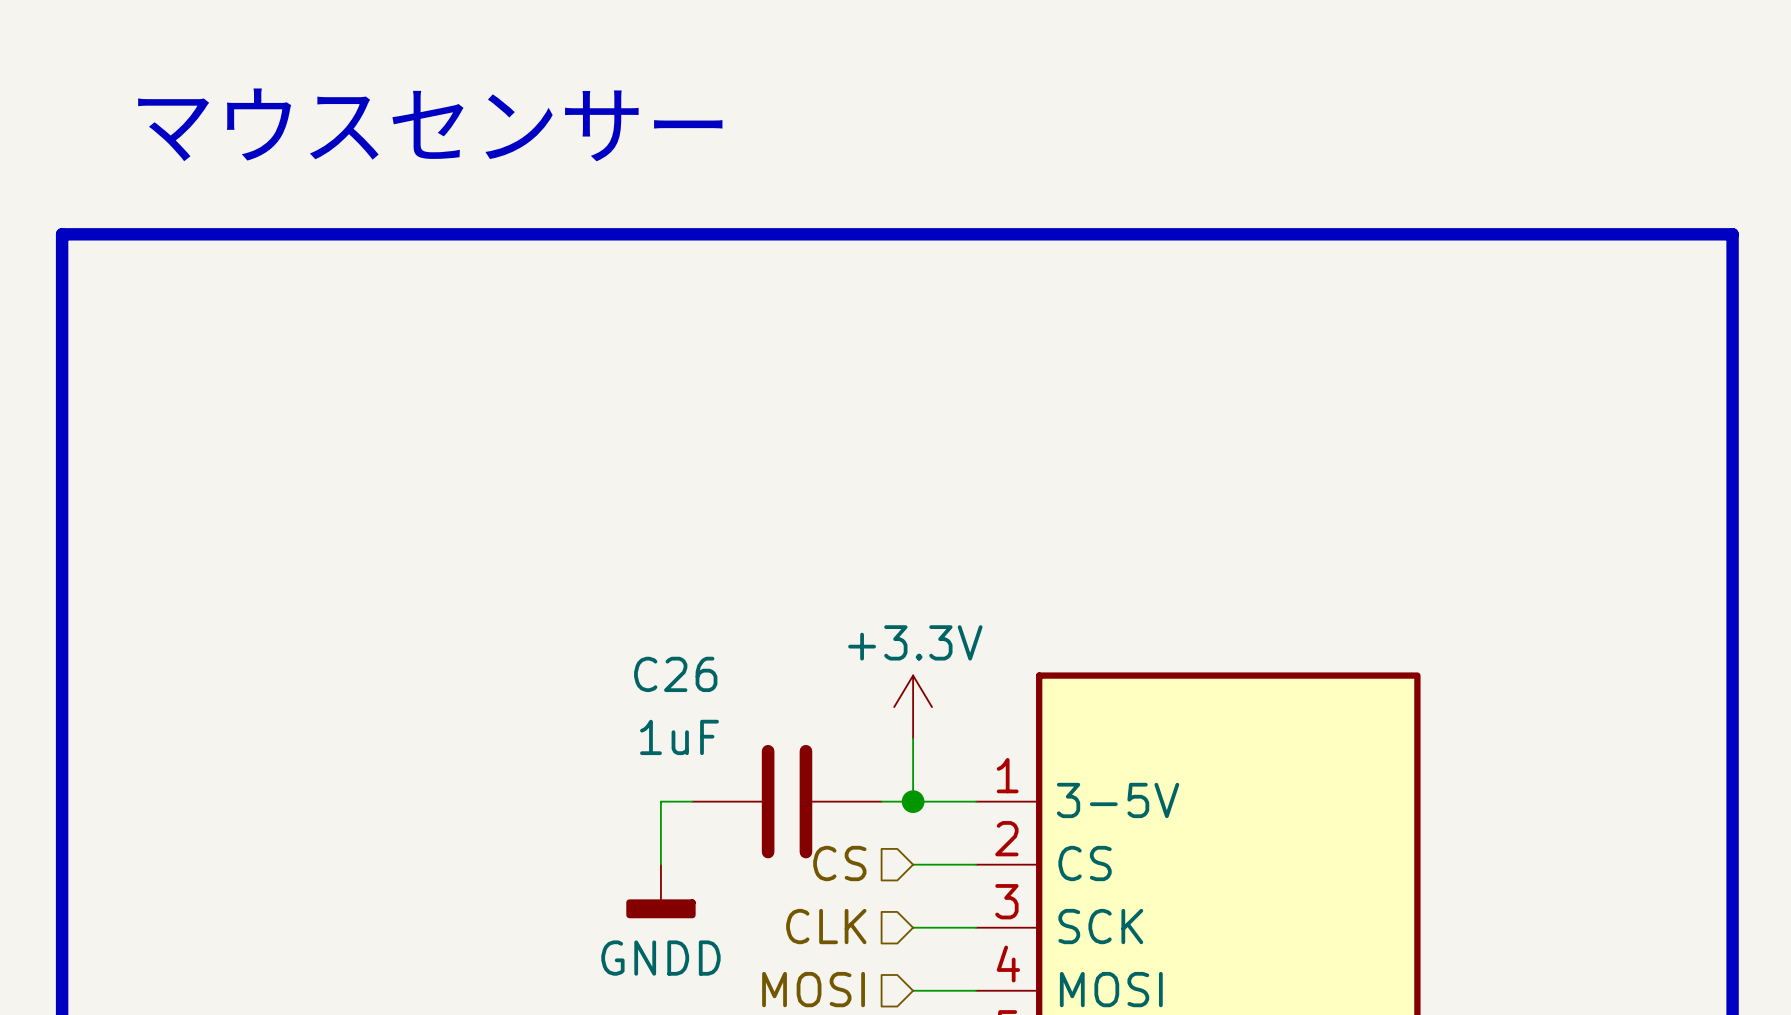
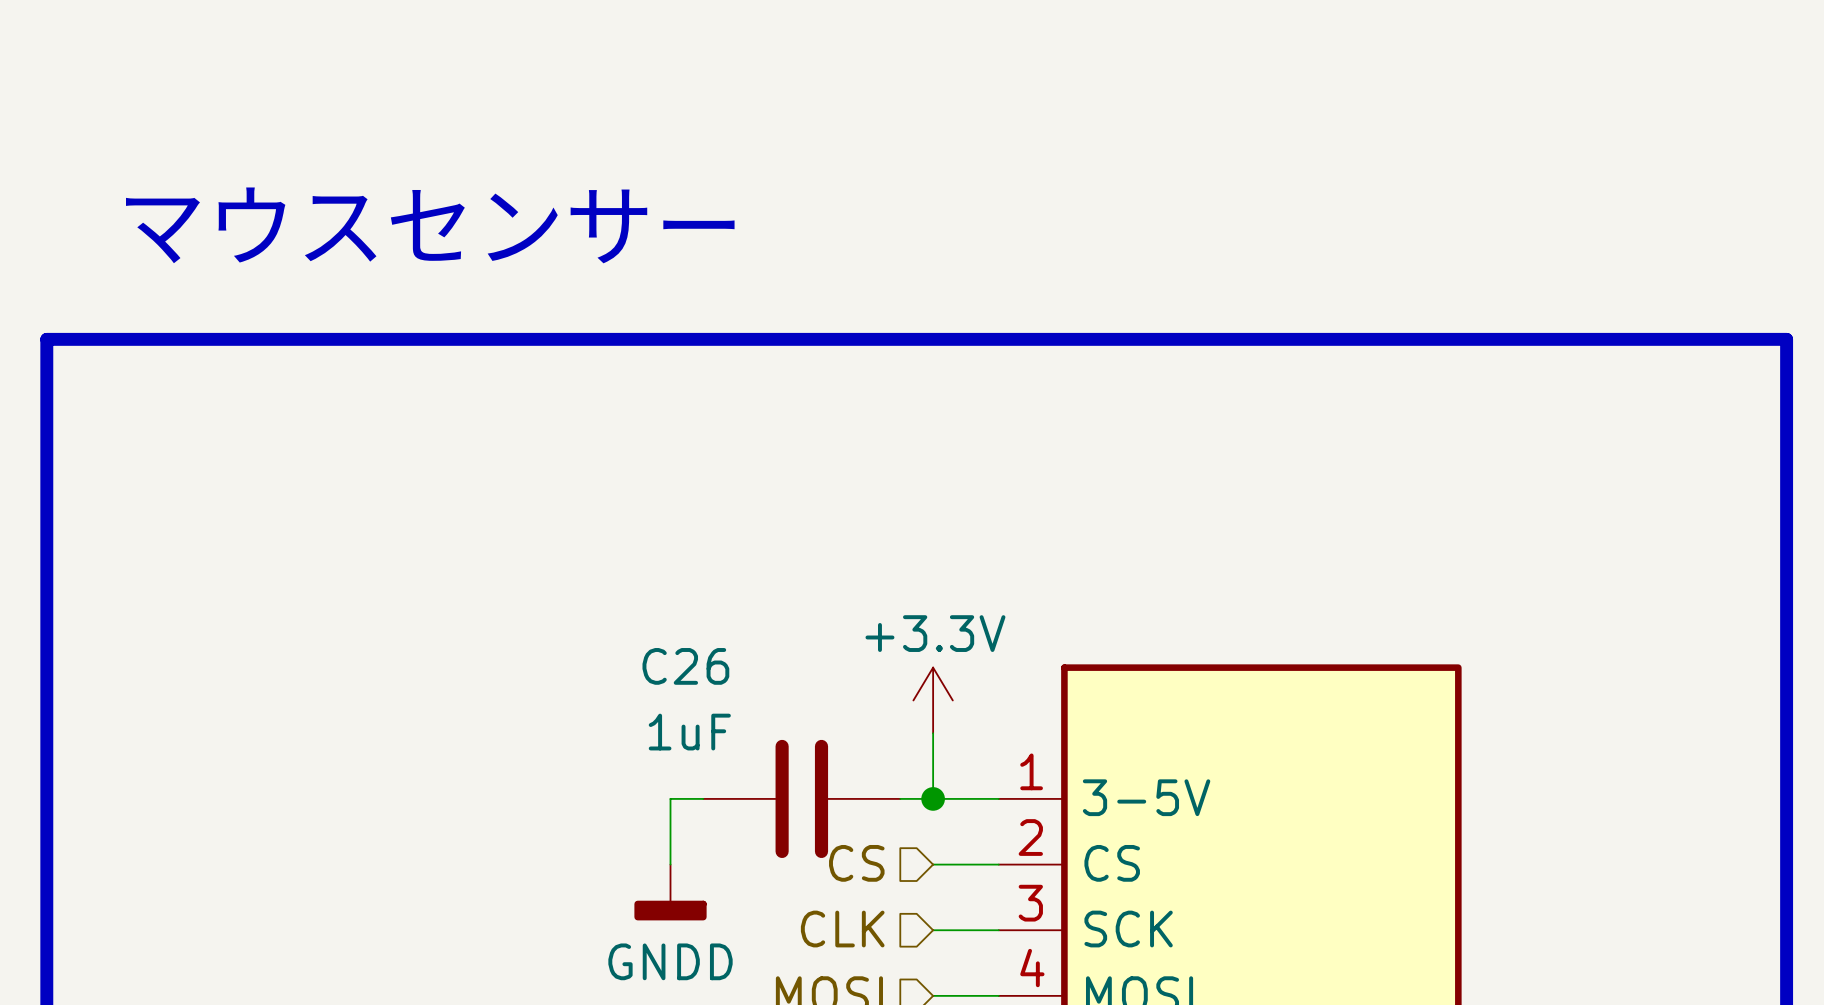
text position: マウスセンサー (430, 124) -> マウスセンサー (430, 225)
line: (62, 360) (62, 234) (1732, 234) (1732, 360) -> (46, 339) (1786, 339)

